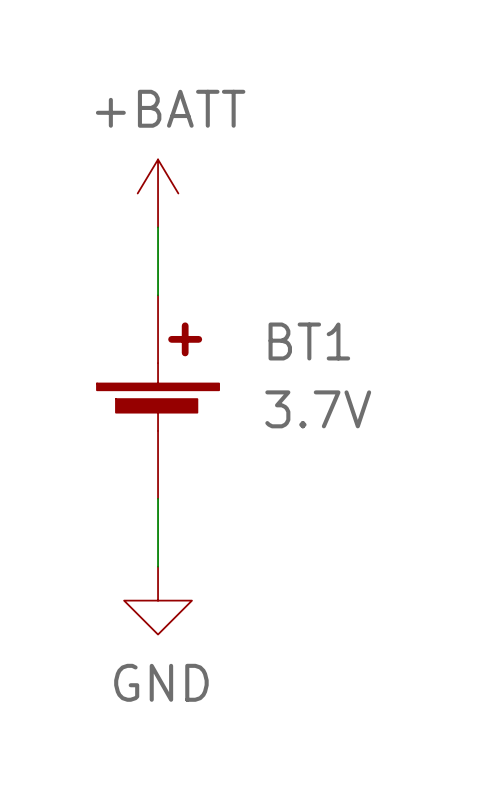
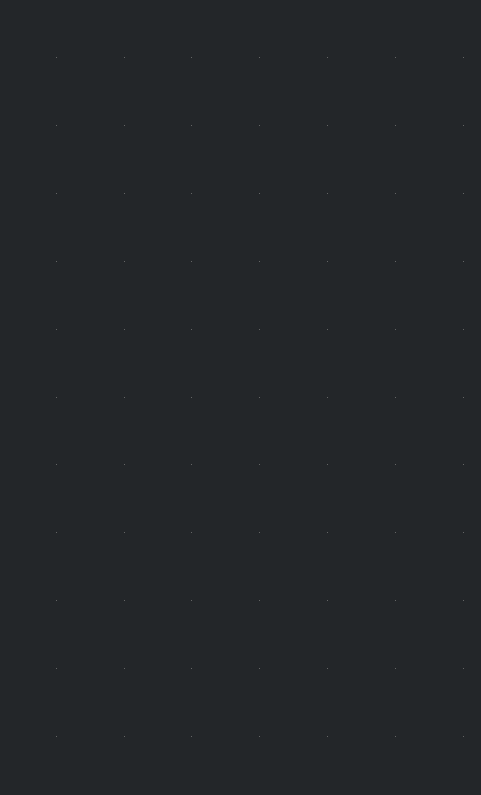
power symbol: +BATT (158, 193) -> none
wire: (158, 227) (158, 295) -> none
BT1: 3.7V (158, 397) -> none
wire: (158, 498) (158, 566) -> none
power symbol: GND (158, 600) -> none

